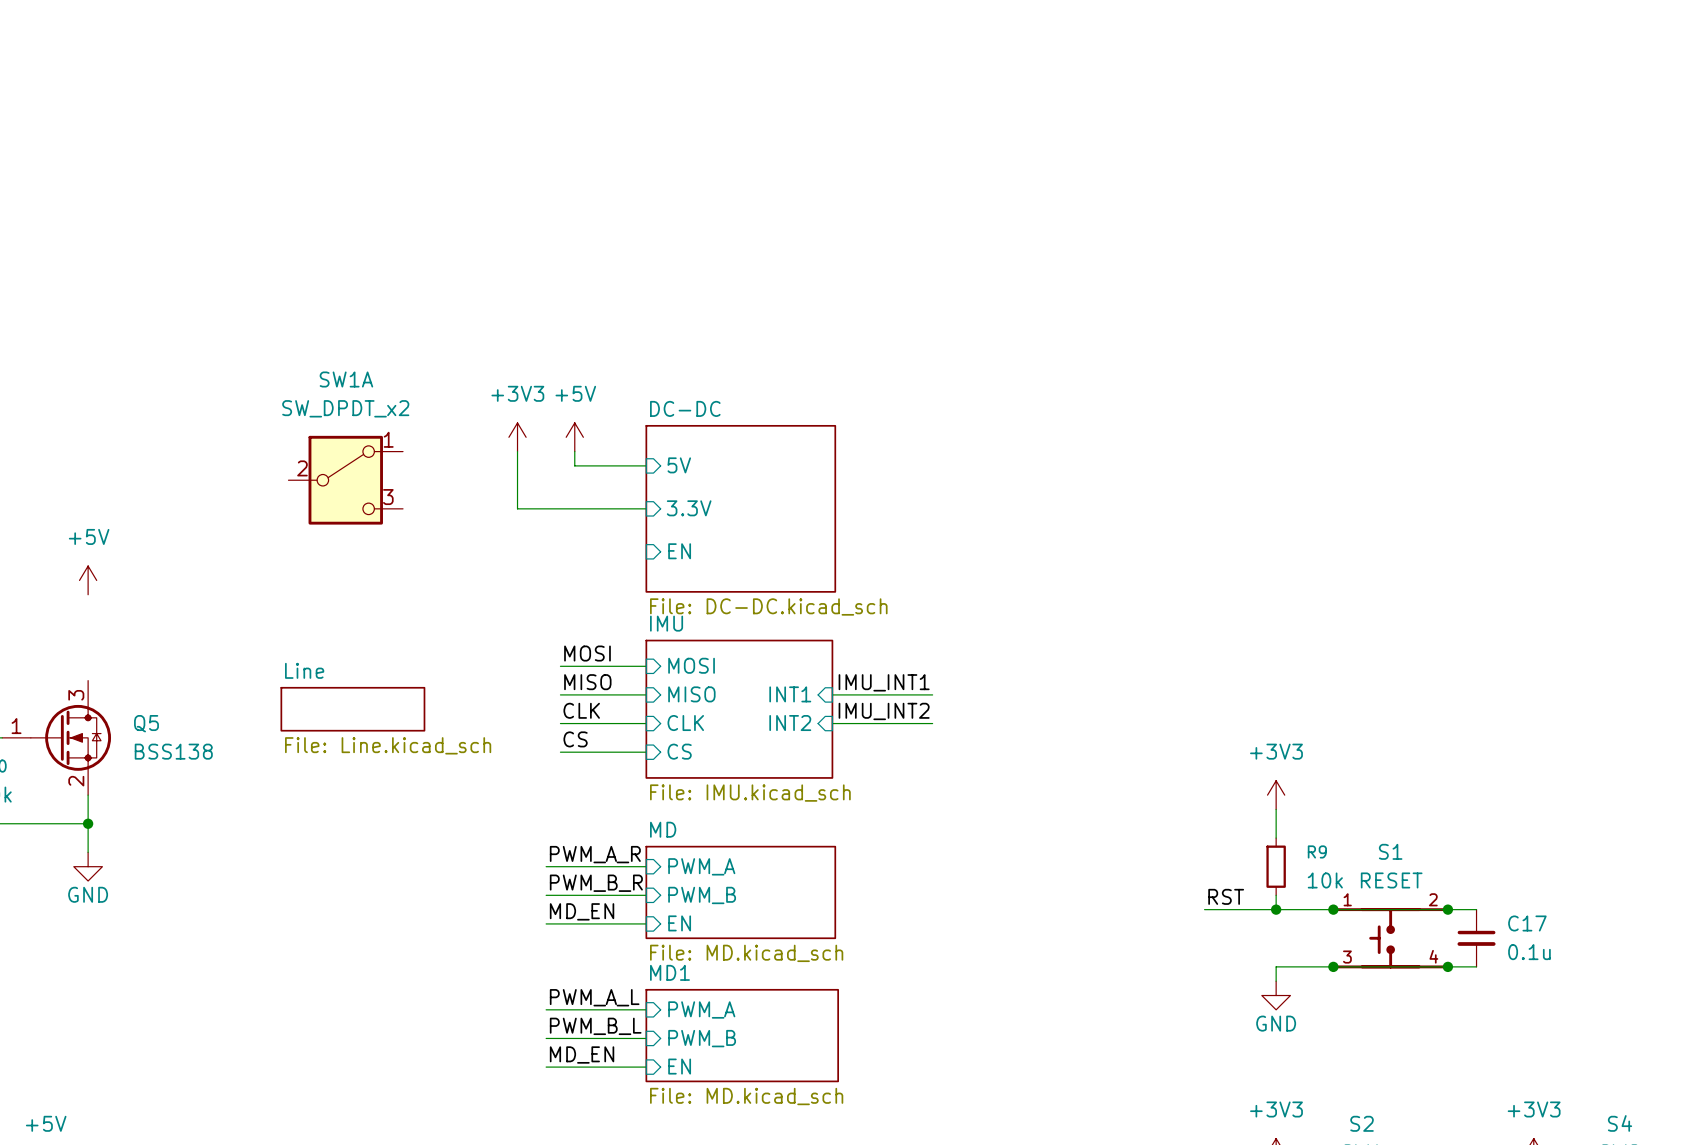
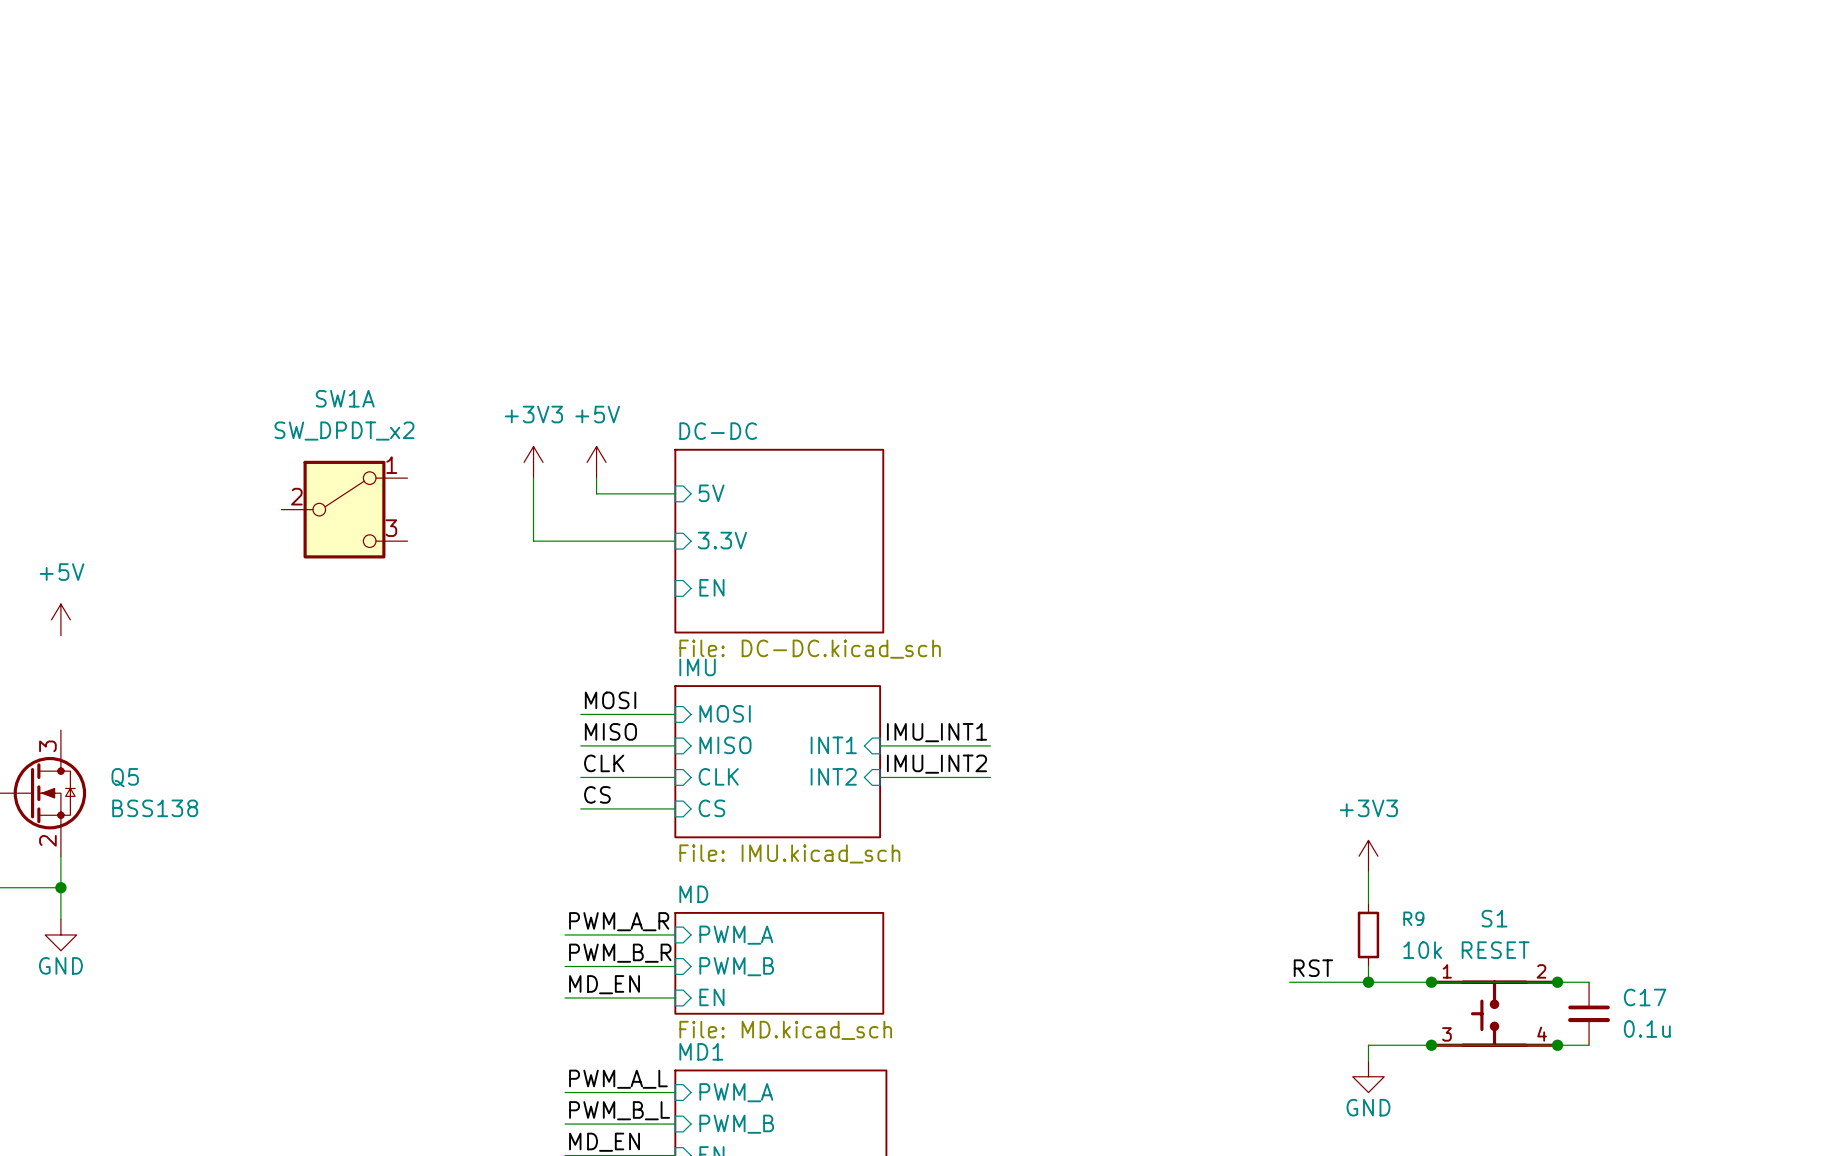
sheet Line: File: Line.kicad_sch (352, 709) -> none

